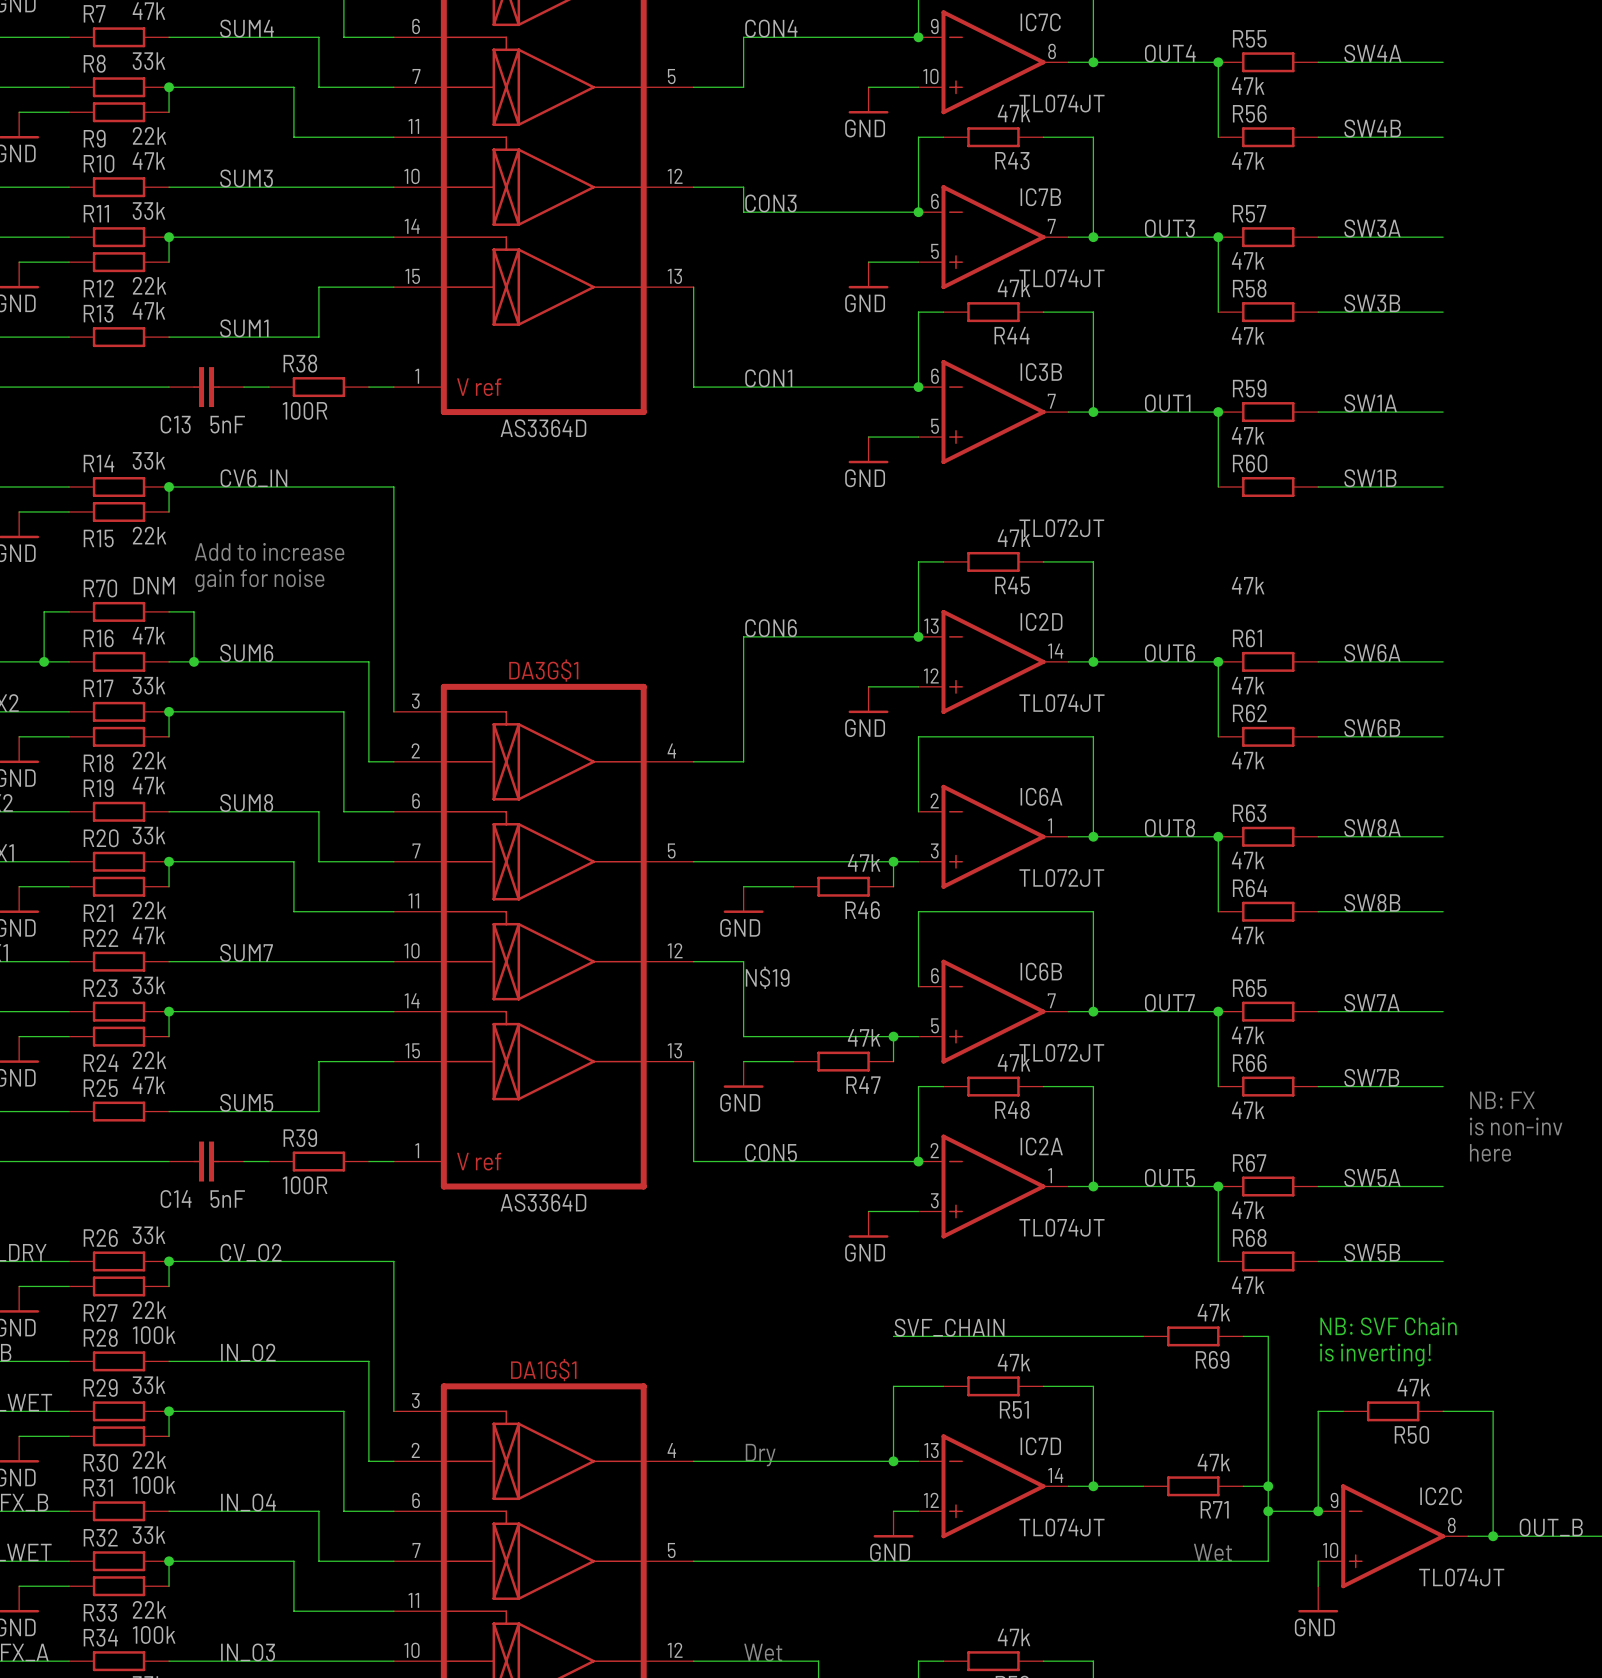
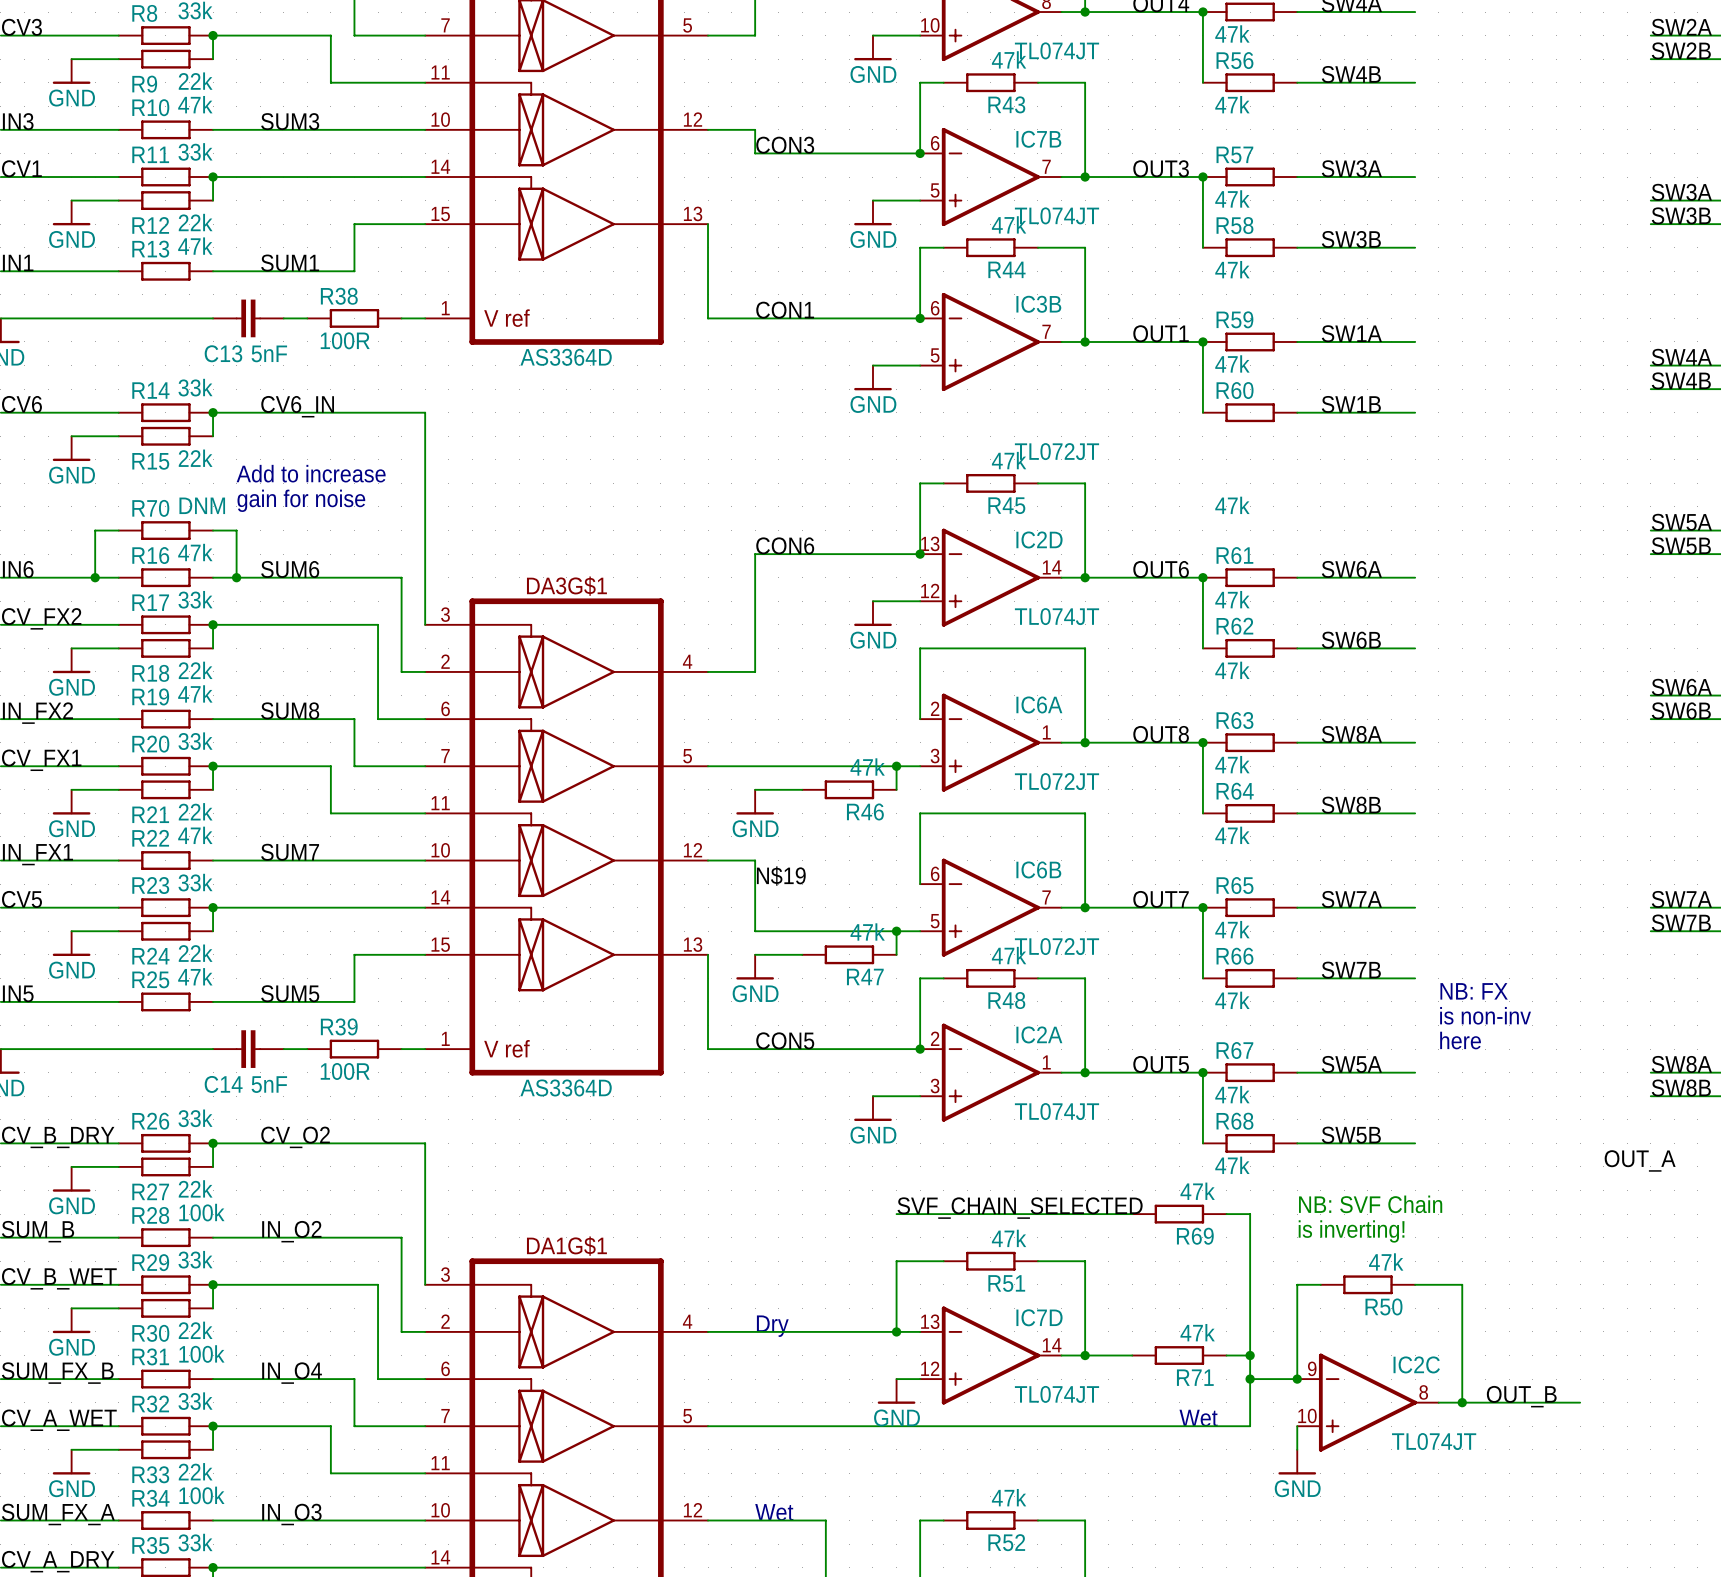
label: SVF_CHAIN (949, 1327) -> SVF_CHAIN_SELECTED (1020, 1208)

